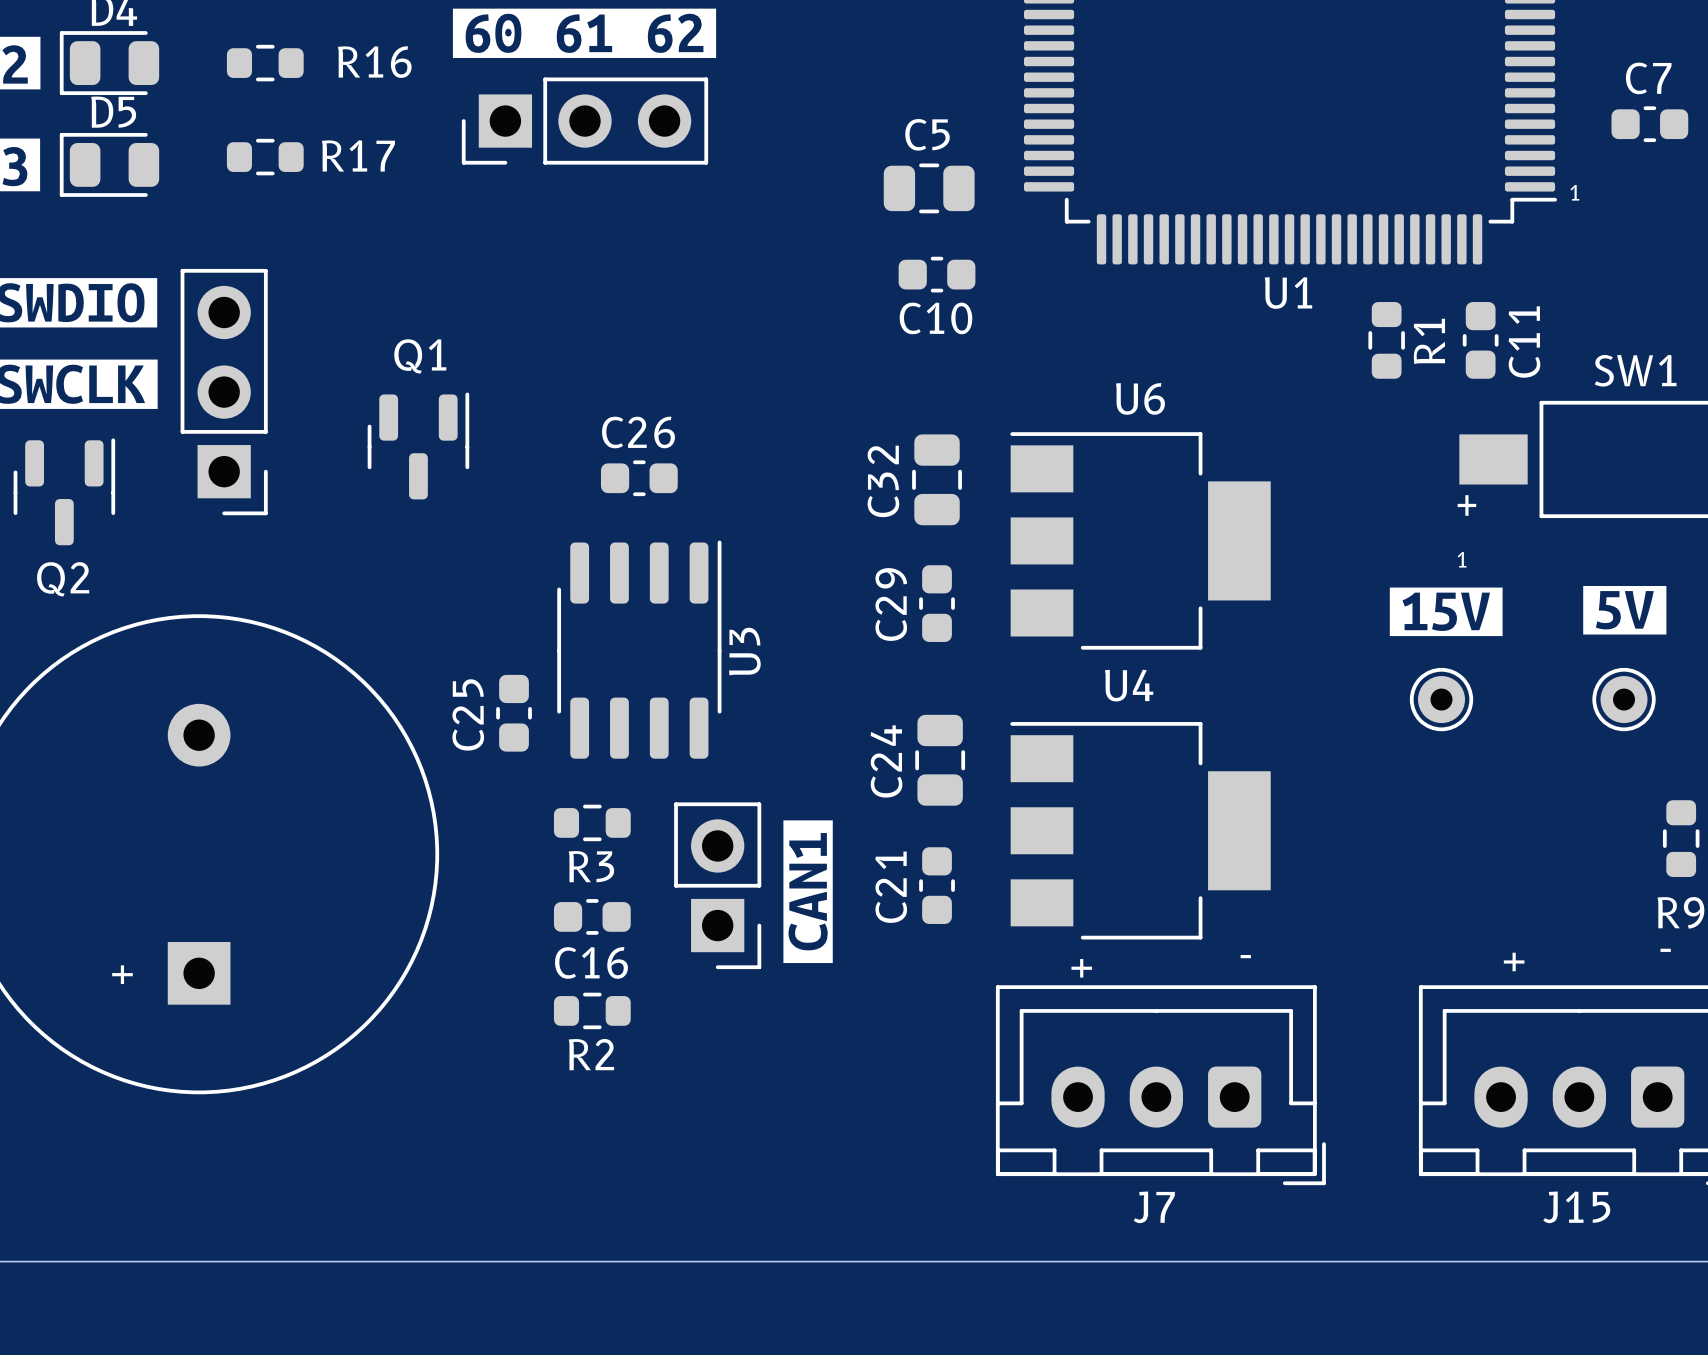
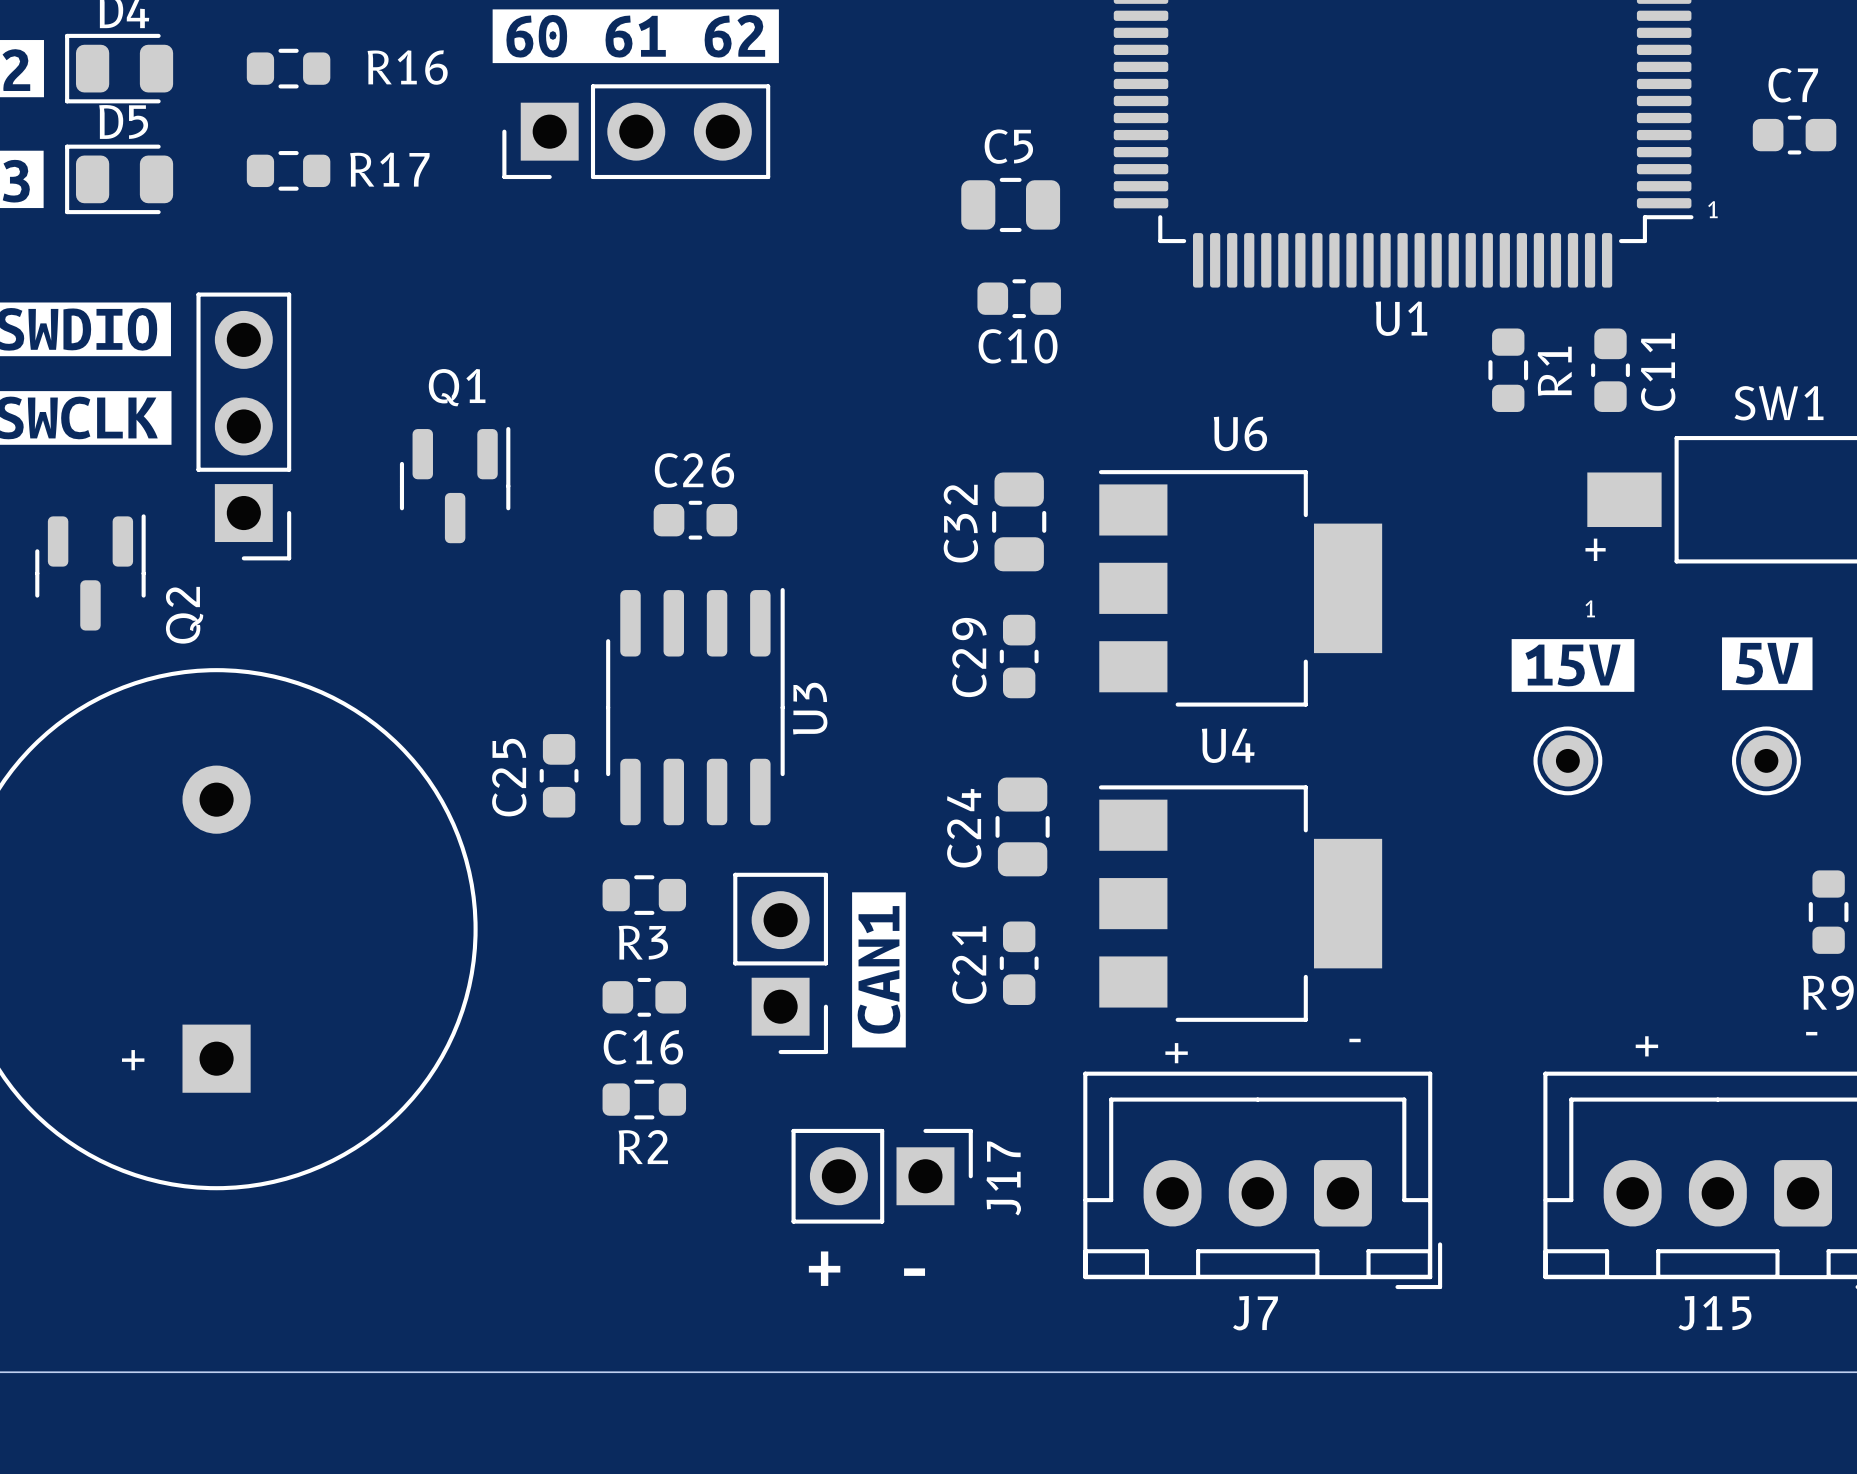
Q2 position: (64, 491) -> (90, 572)
Q2 name rotation: 0° (63, 579) -> 90° counterclockwise (184, 615)
Q2 name position: Q2 (63, 579) -> Q2 (184, 615)
J17: none -> (882, 1176)
text: none -> + (824, 1268)
text: none -> - (914, 1272)

